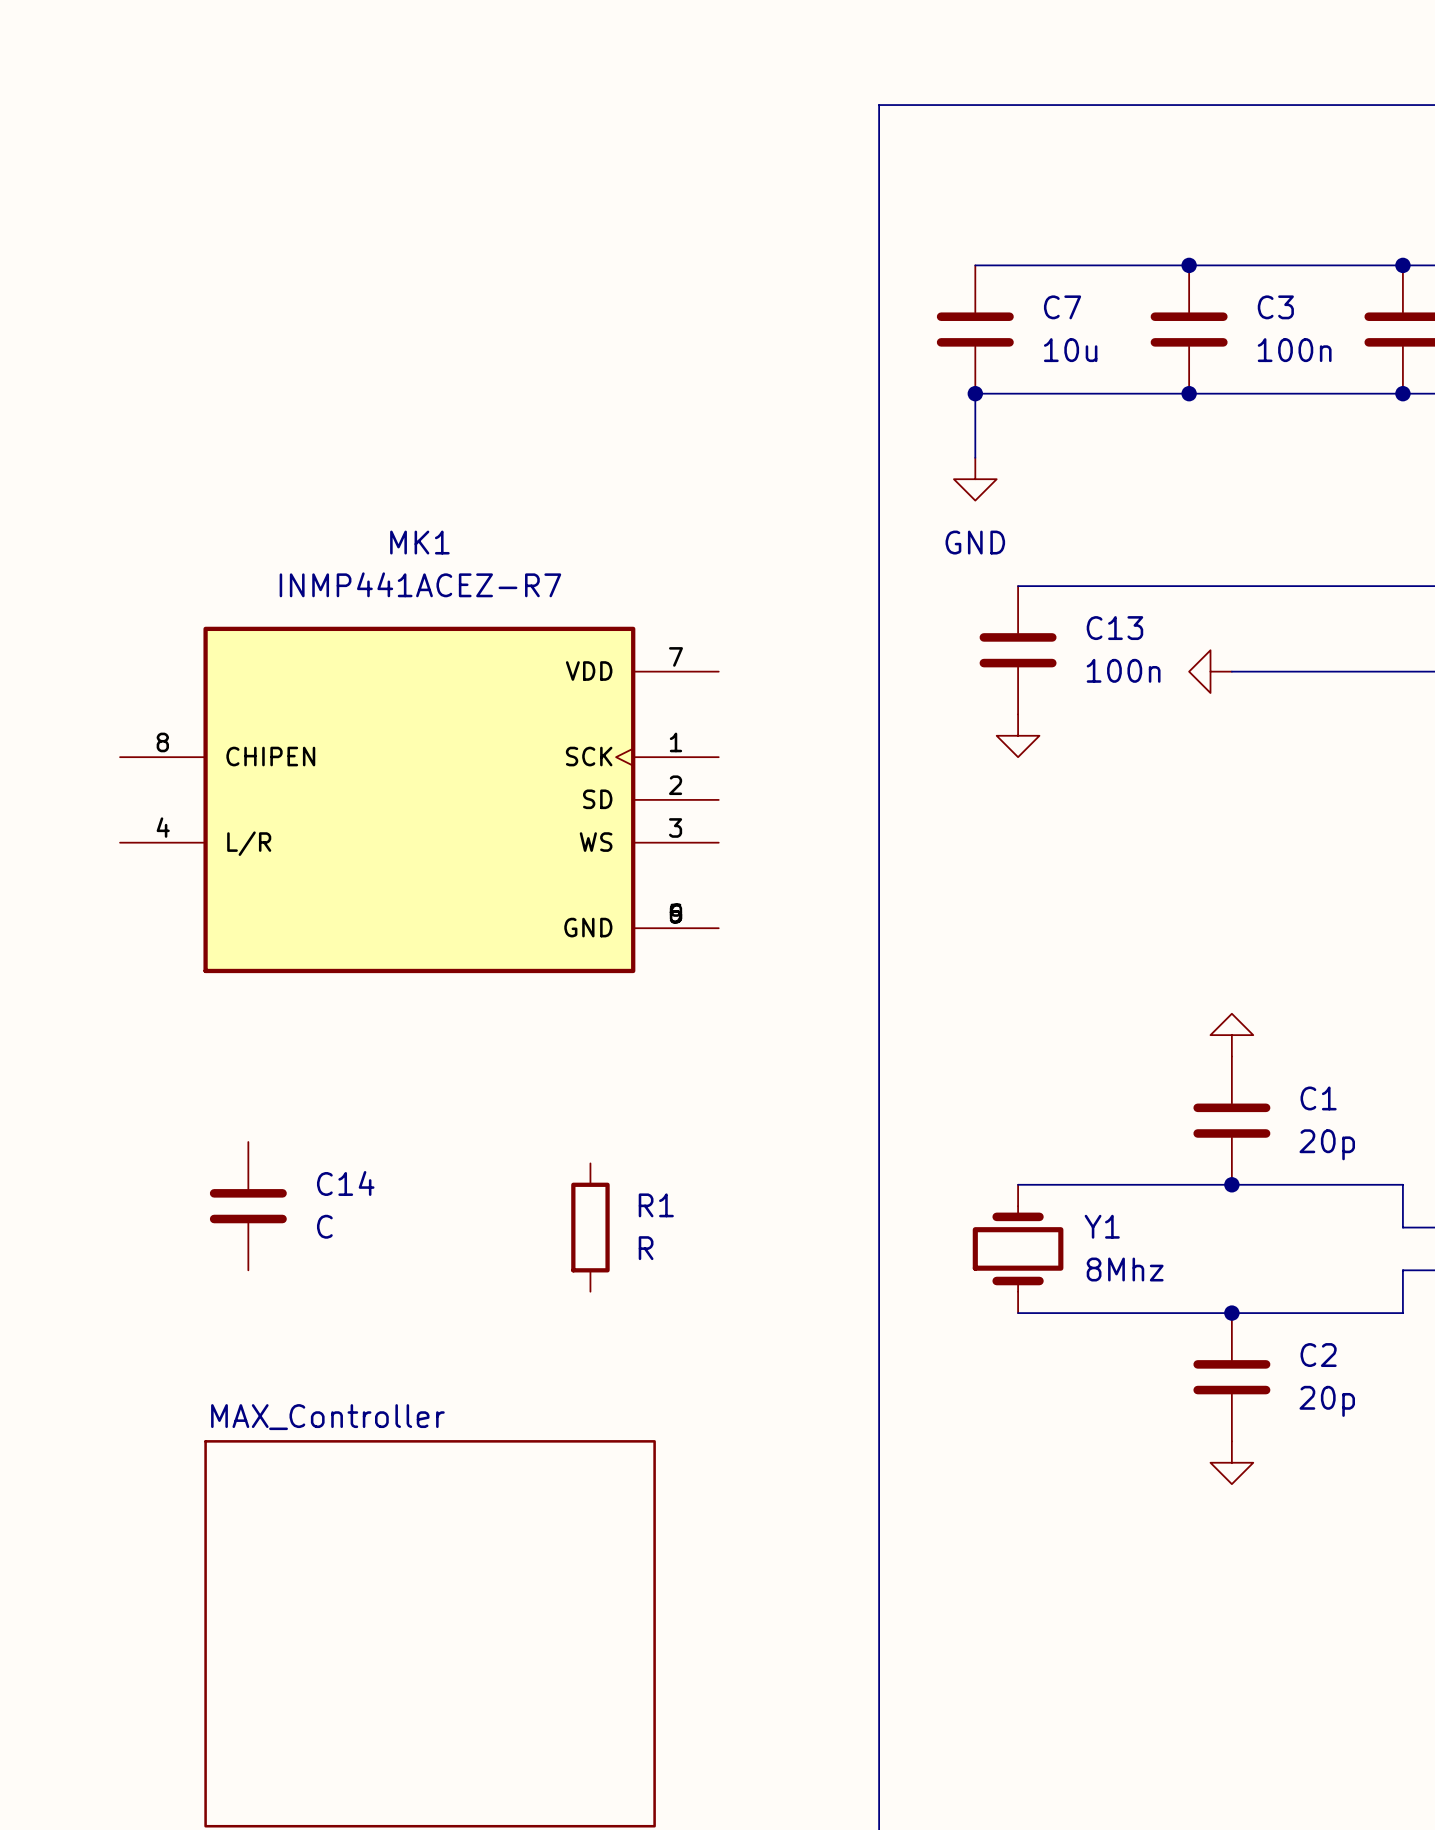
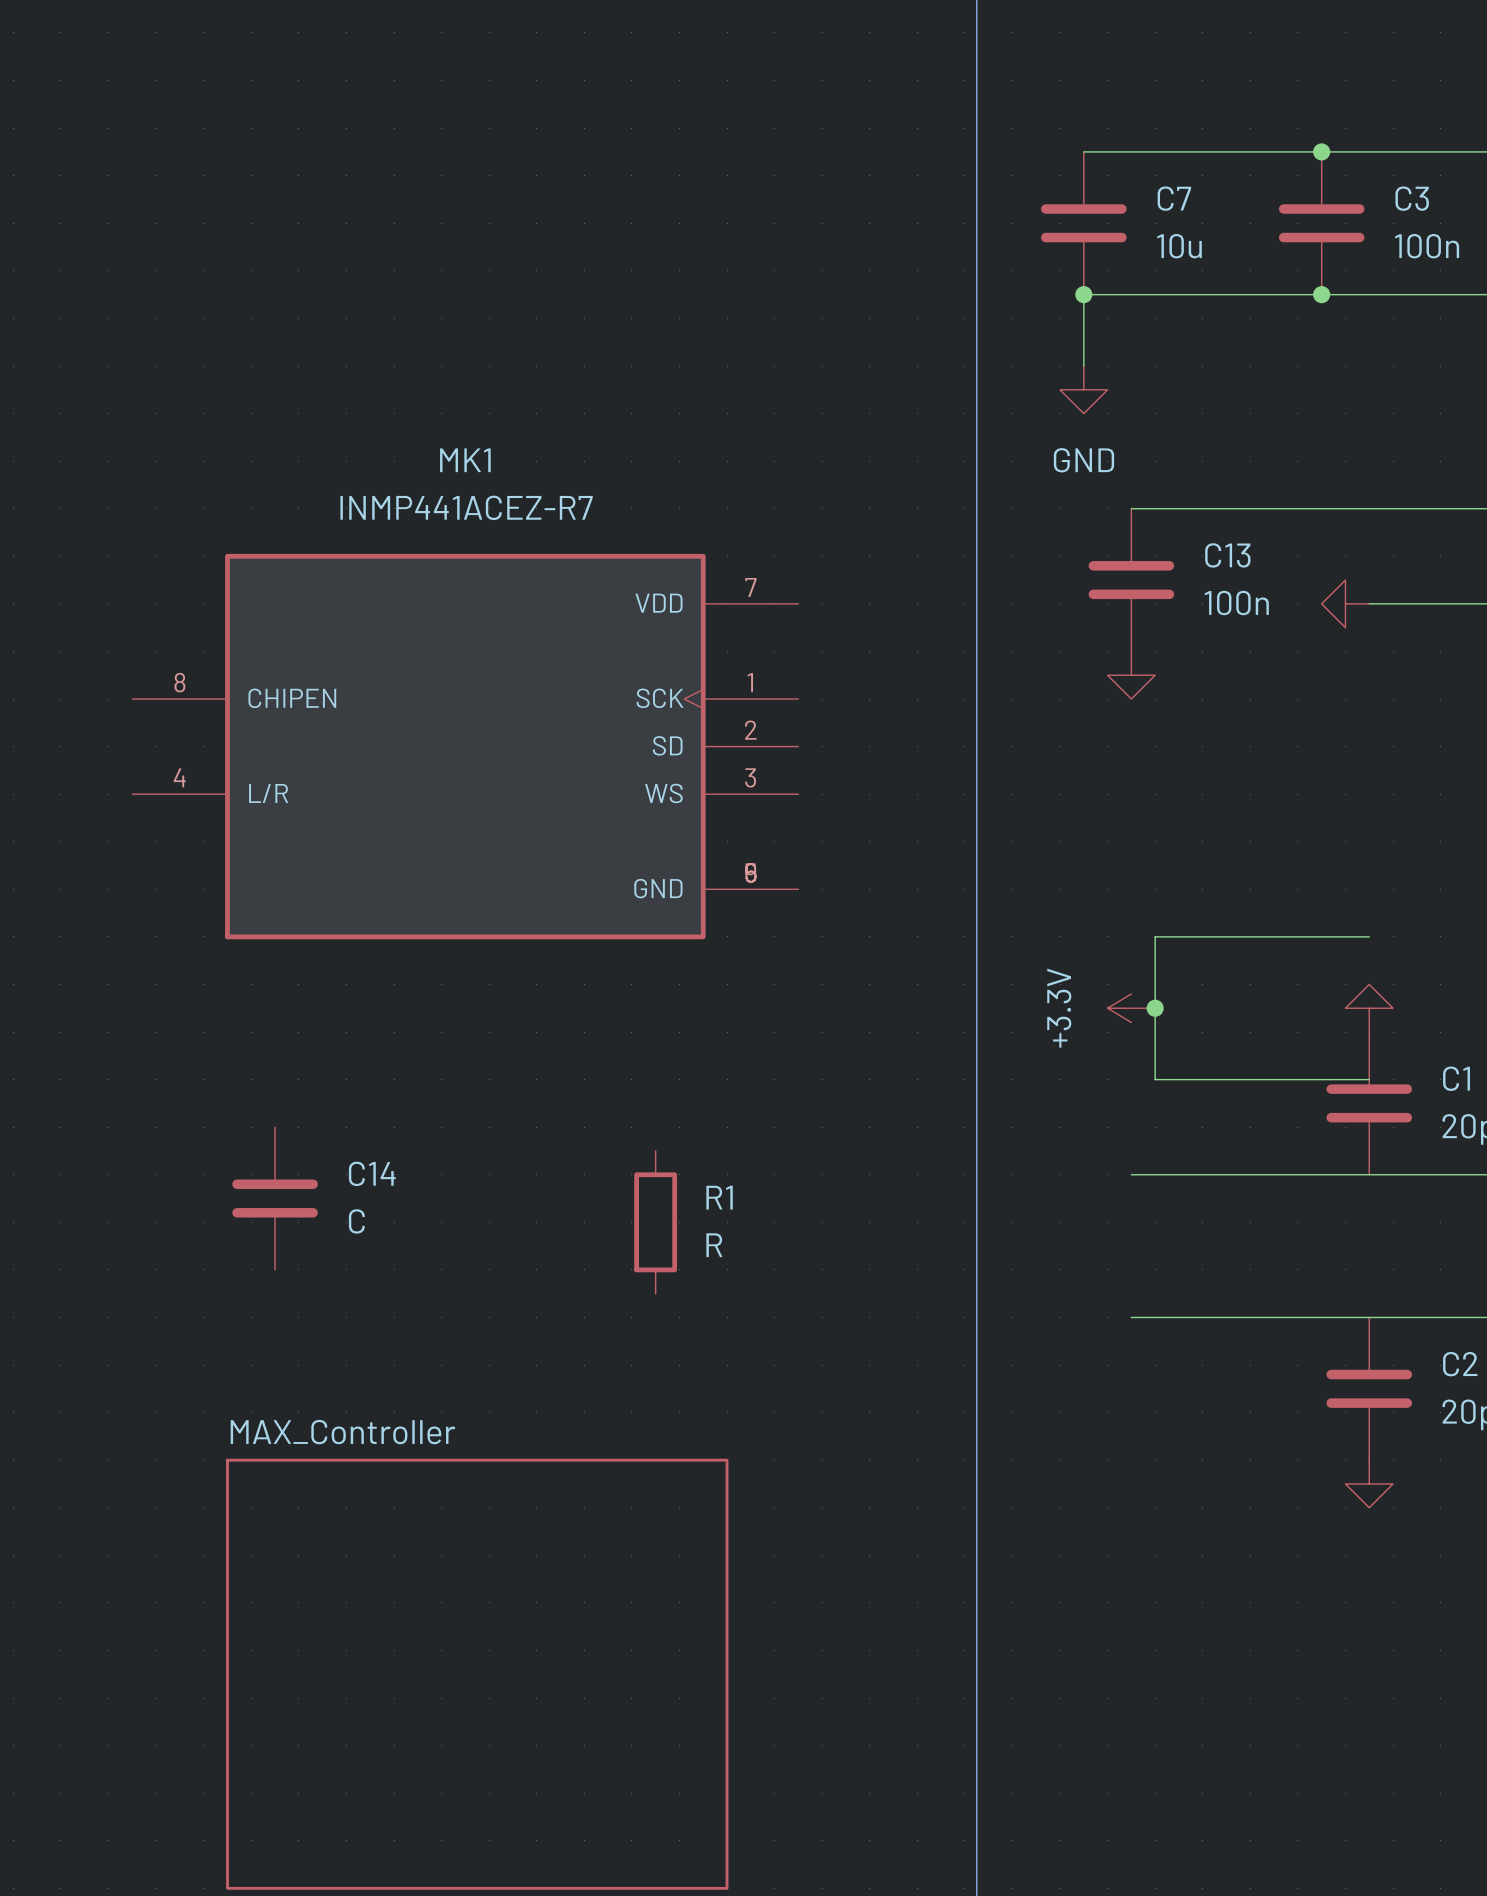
wire: none -> (1369, 936) (1155, 936) (1155, 1079) (1369, 1079)
power symbol: none -> +3.3V (1131, 1008)
junction: none -> (1155, 1008)
junction: (1231, 1184) -> none
Y1: 8Mhz (1018, 1248) -> none
junction: (1231, 1313) -> none

